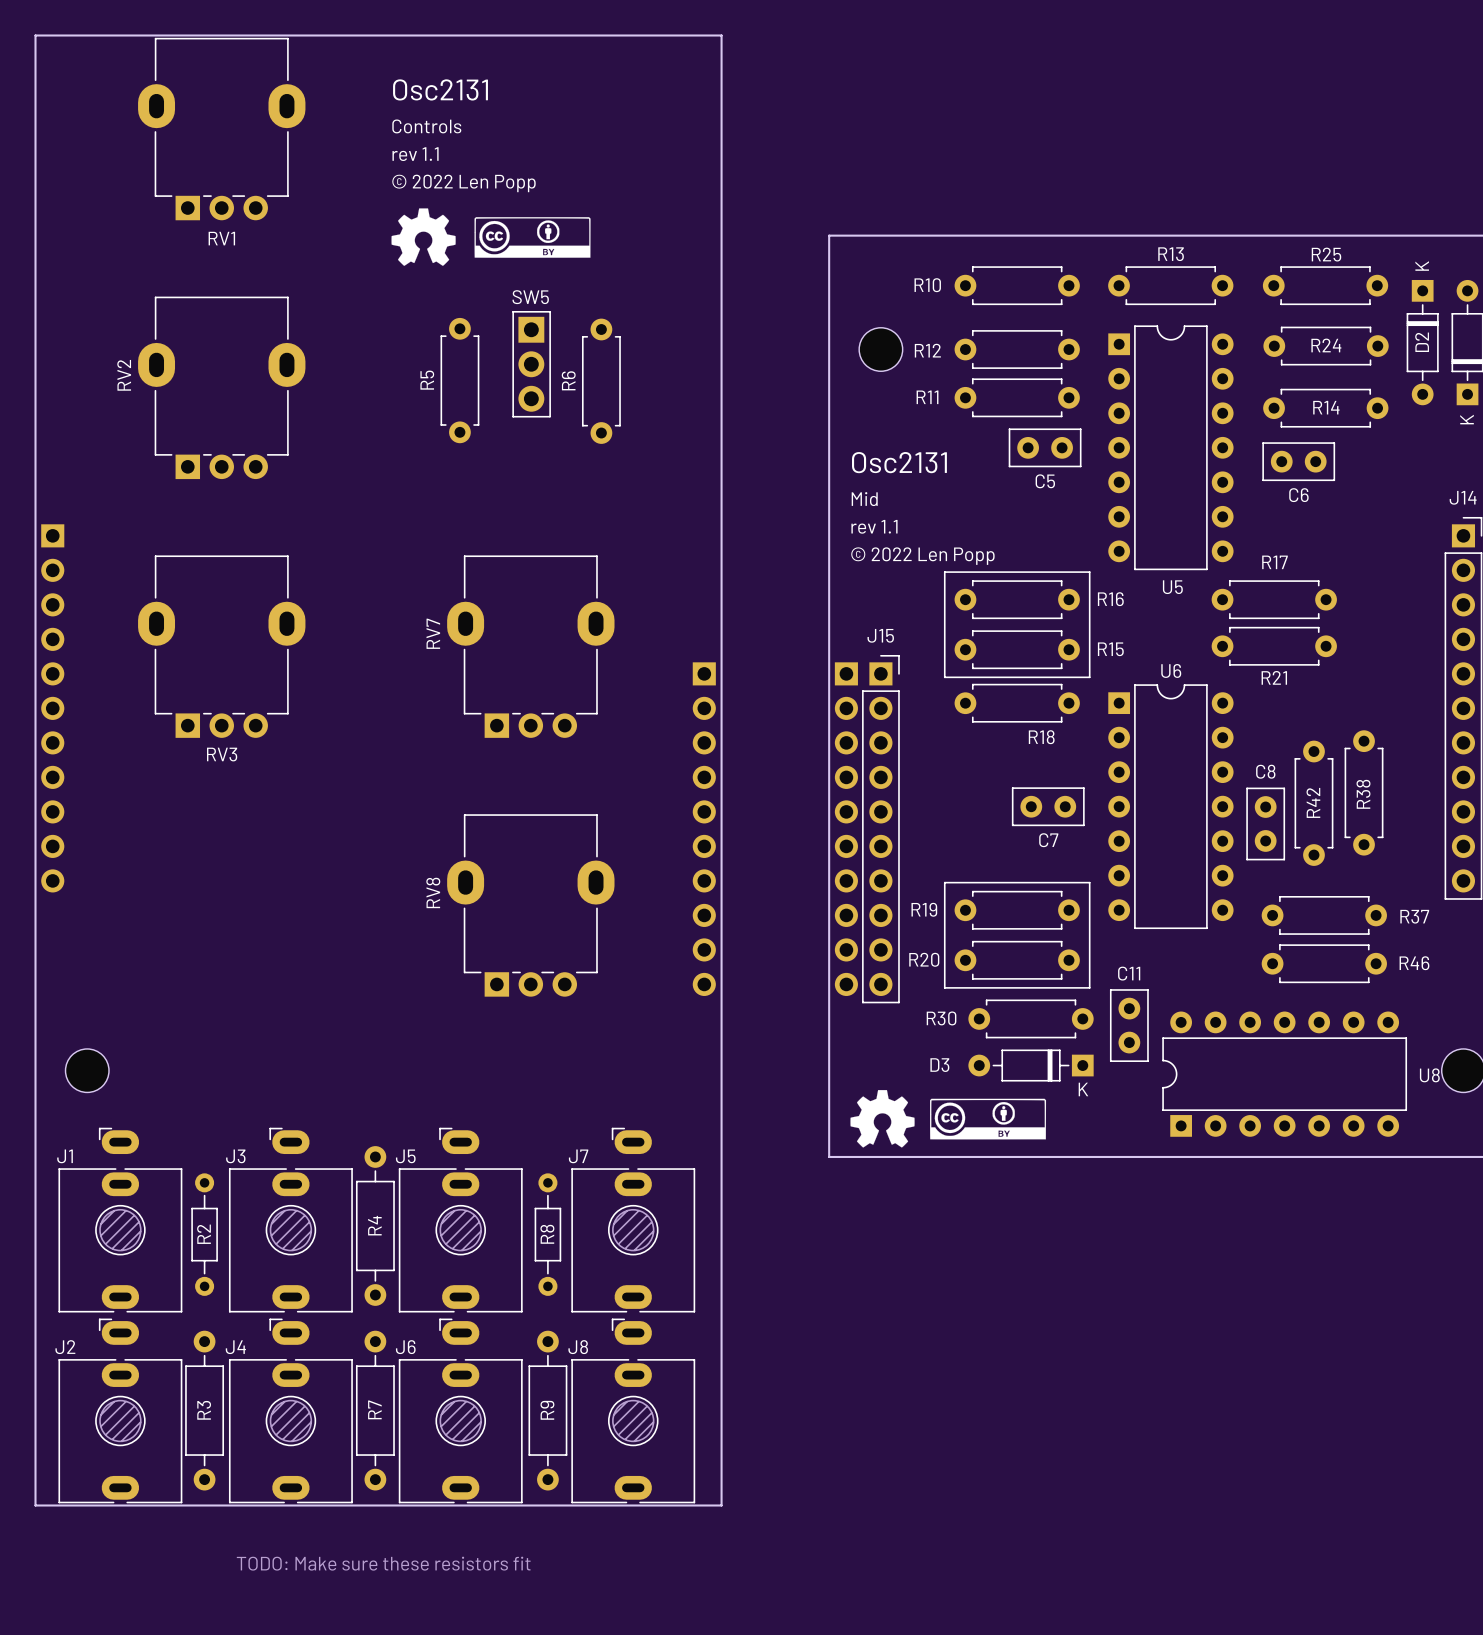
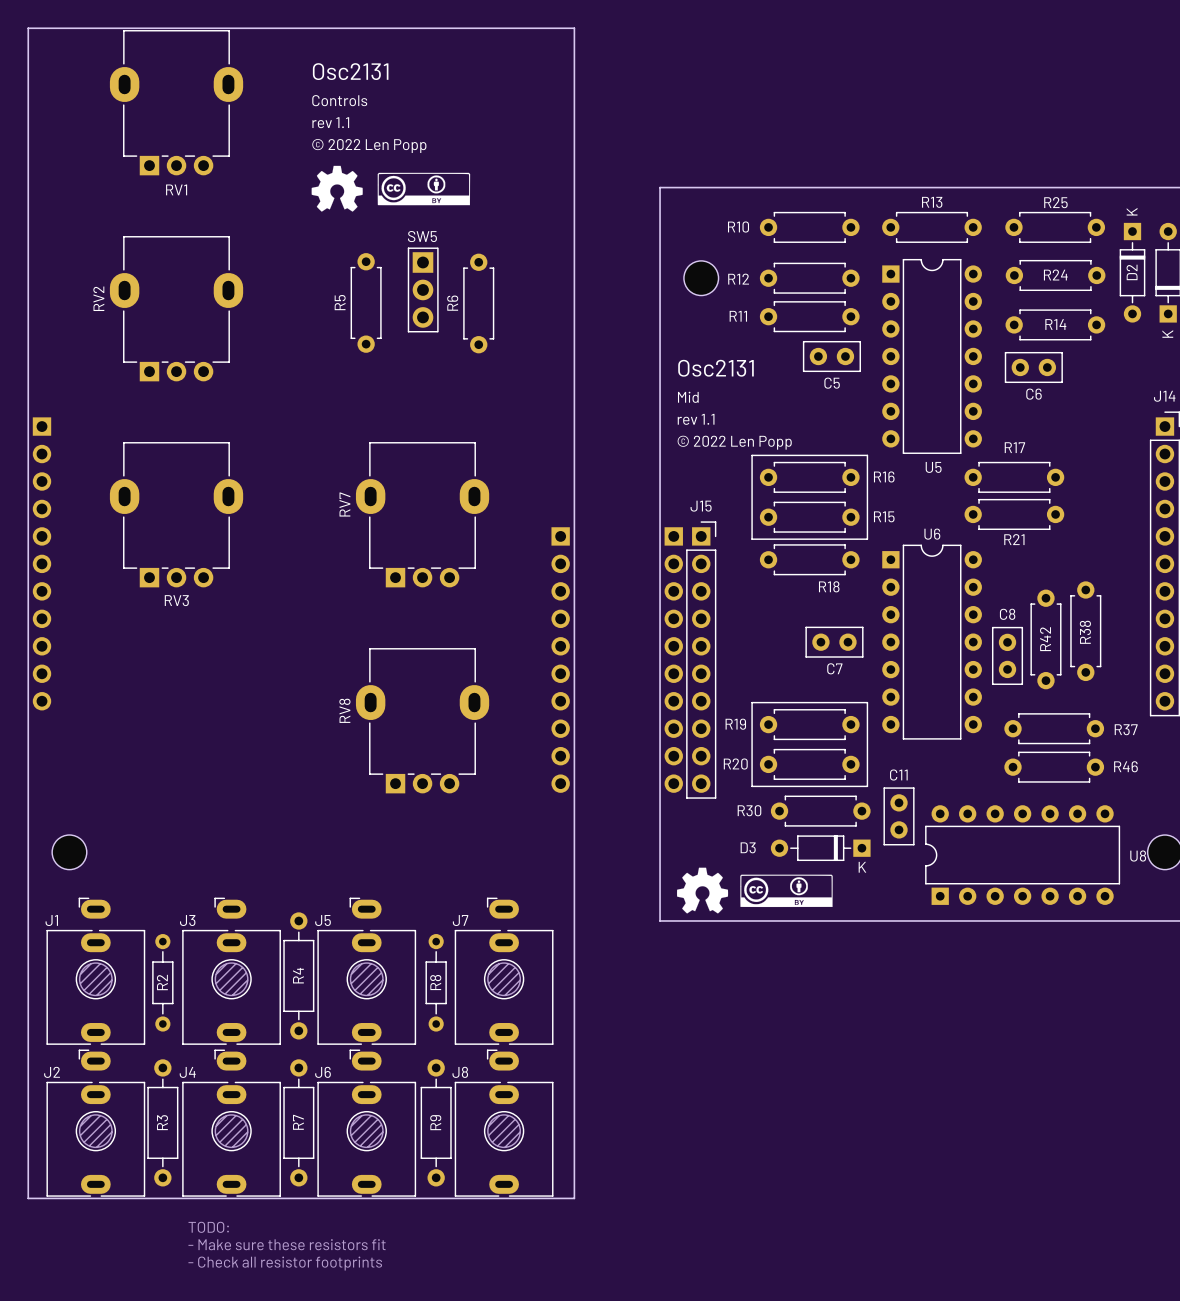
text: none -> TODO: (208, 1227)
text: TODO: Make sure these resistors fit (383, 1563) -> - Make sure these resistors fit (287, 1244)
text: none -> - Check all resistor footprints (285, 1263)

